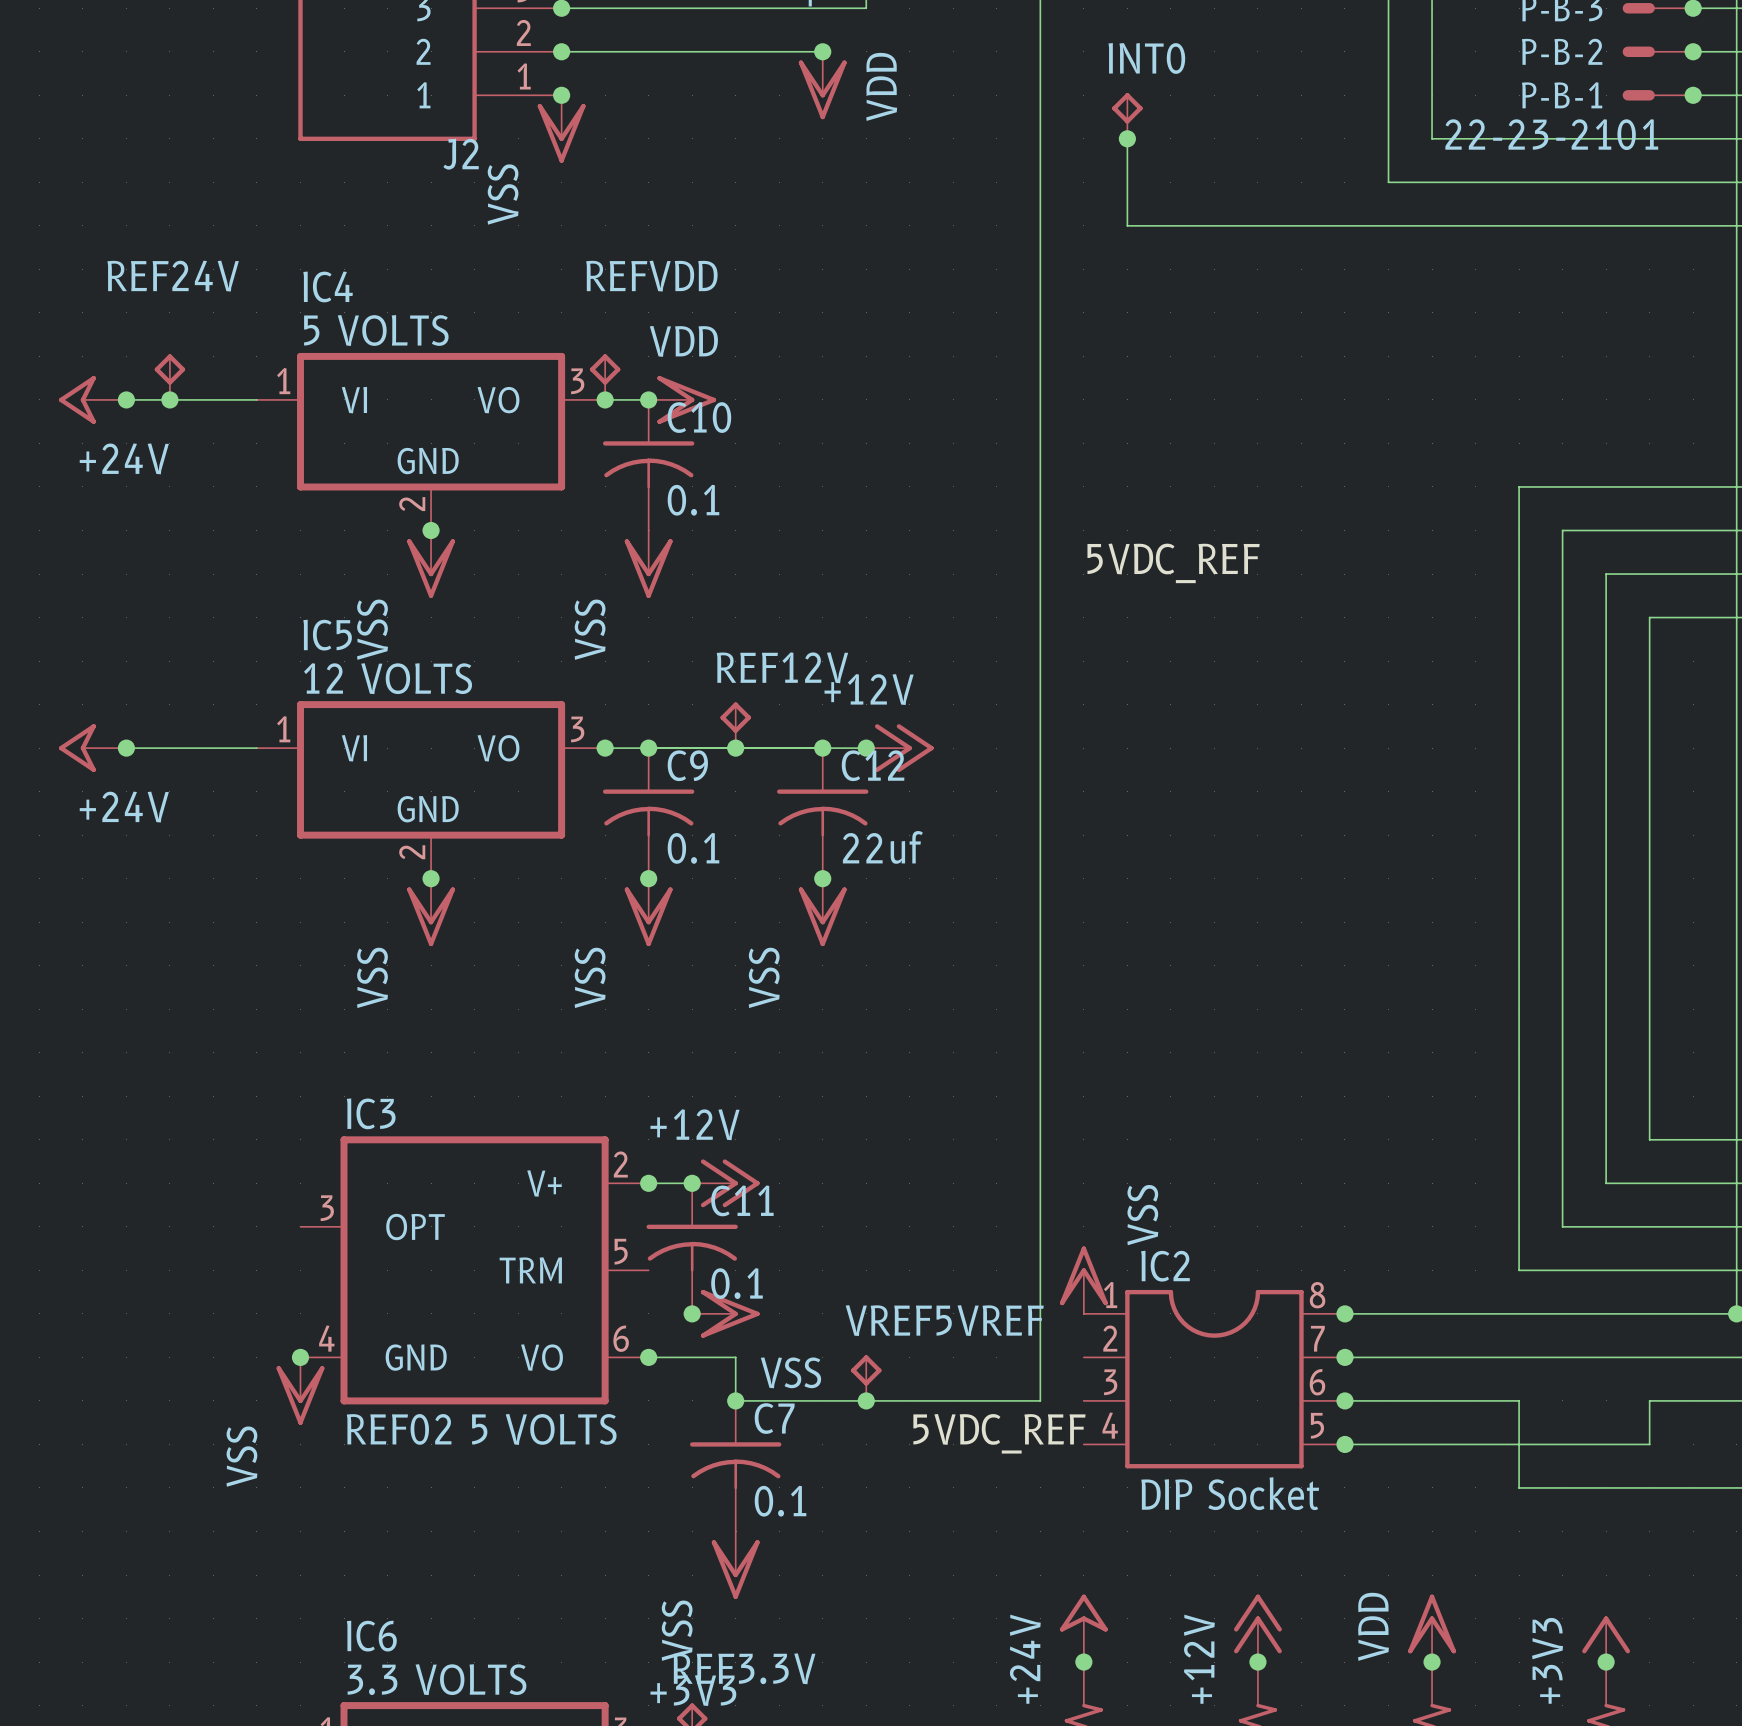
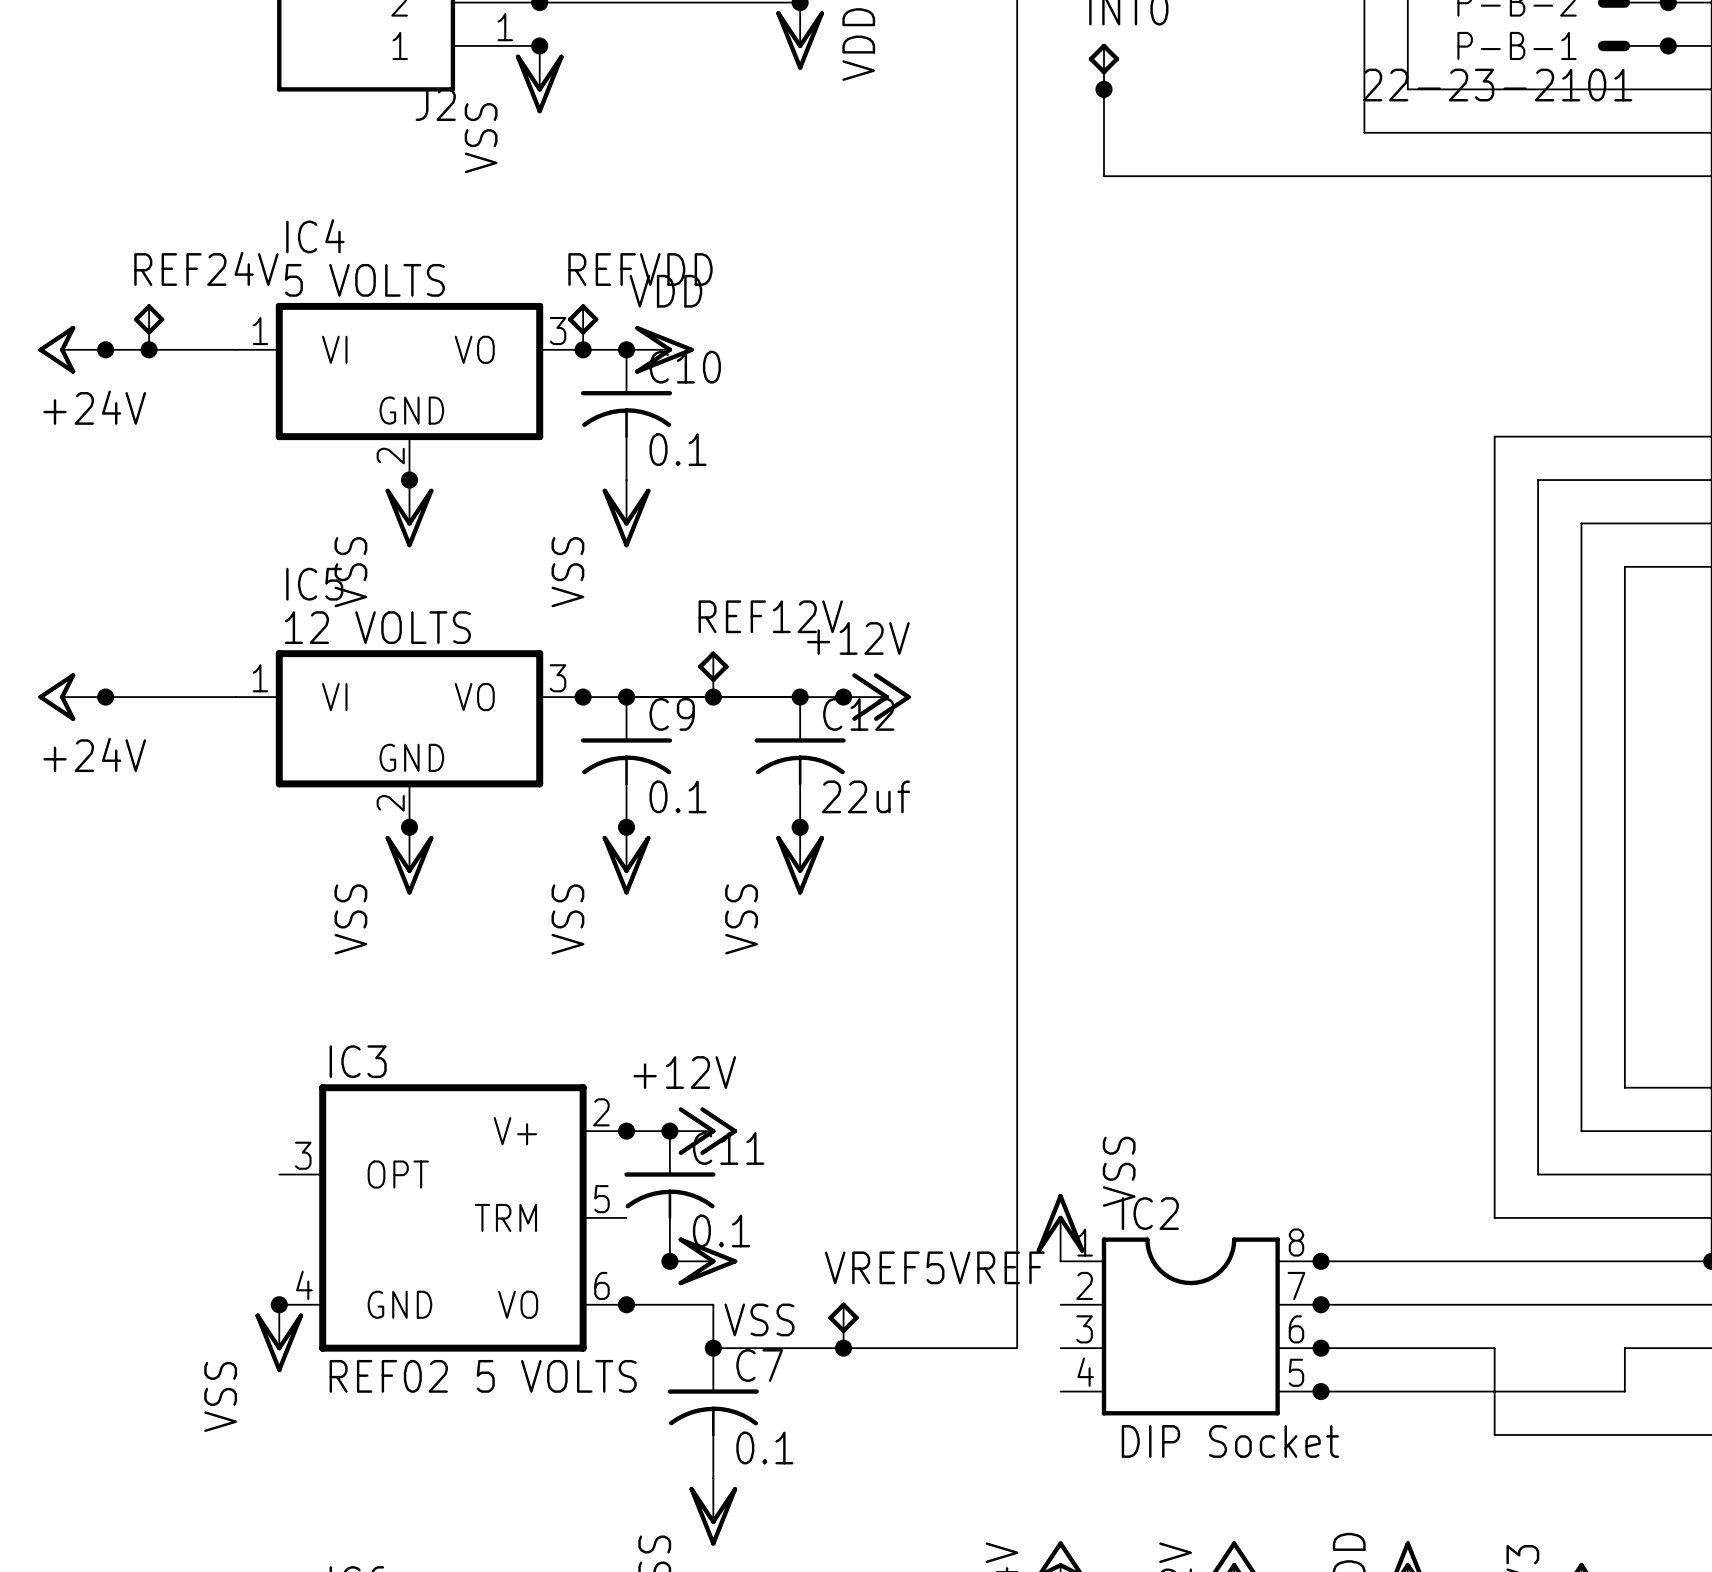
REF24V name position: REF24V (173, 276) -> REF24V (206, 268)
REFVDD name position: REFVDD (651, 276) -> REFVDD (640, 269)
label: 5VDC_REF (1173, 563) -> none
label: 5VDC_REF (999, 1433) -> none

